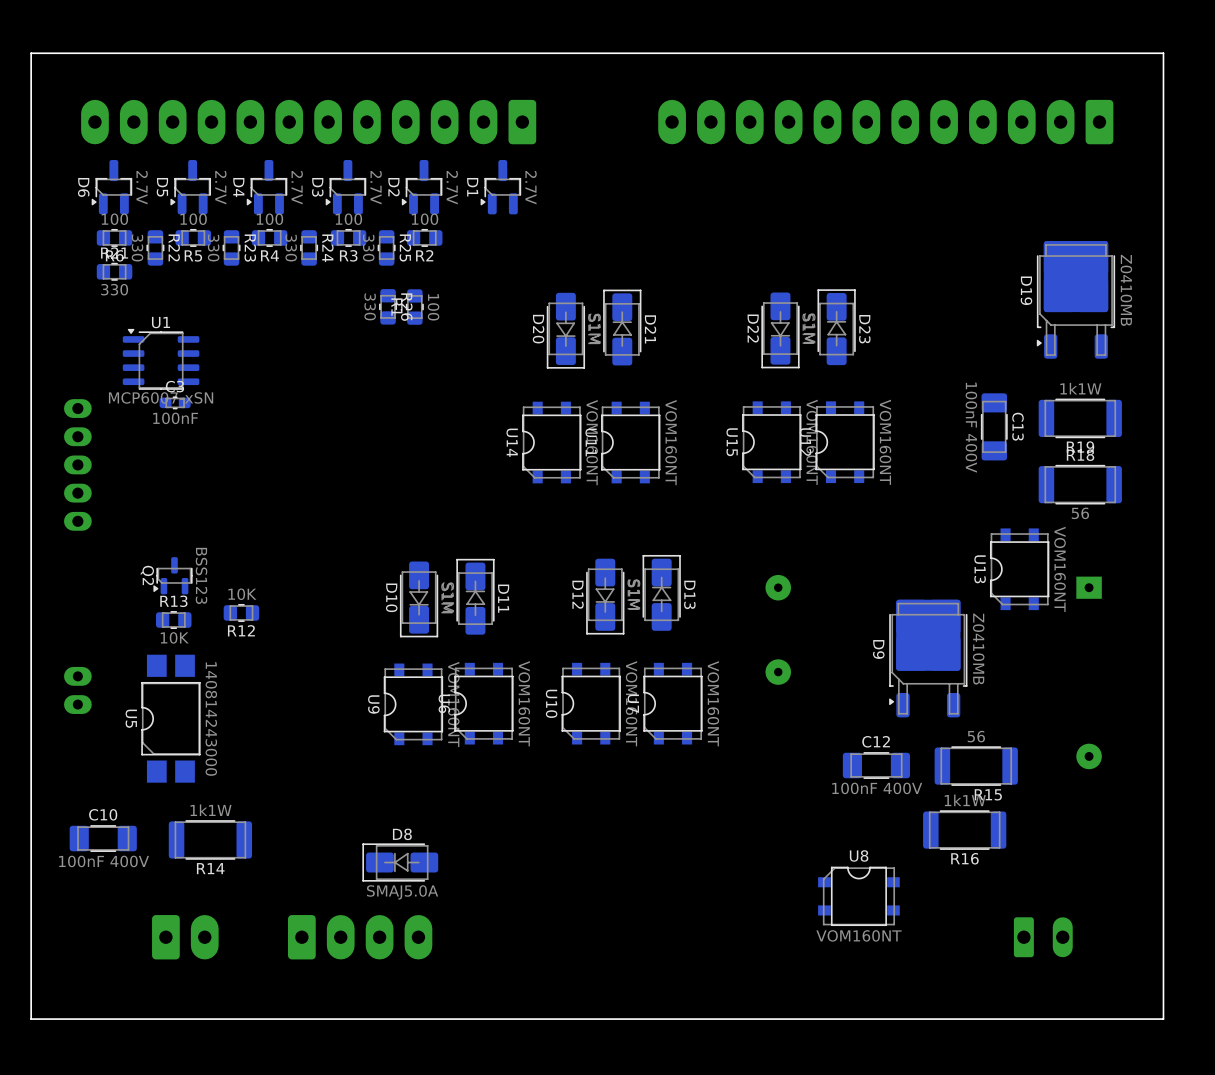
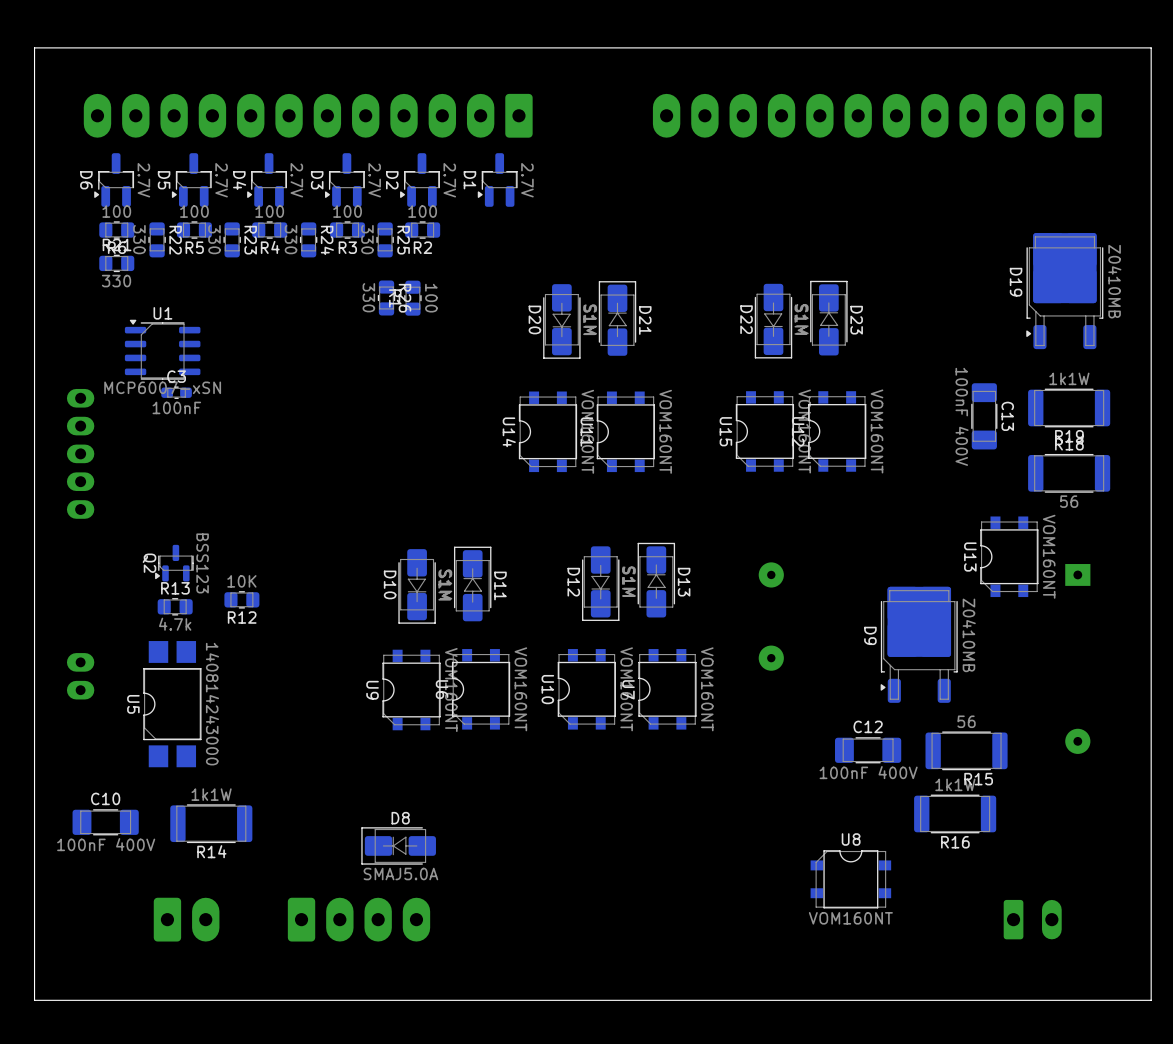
R13 value: 10K (174, 637) -> 4.7k (175, 624)

